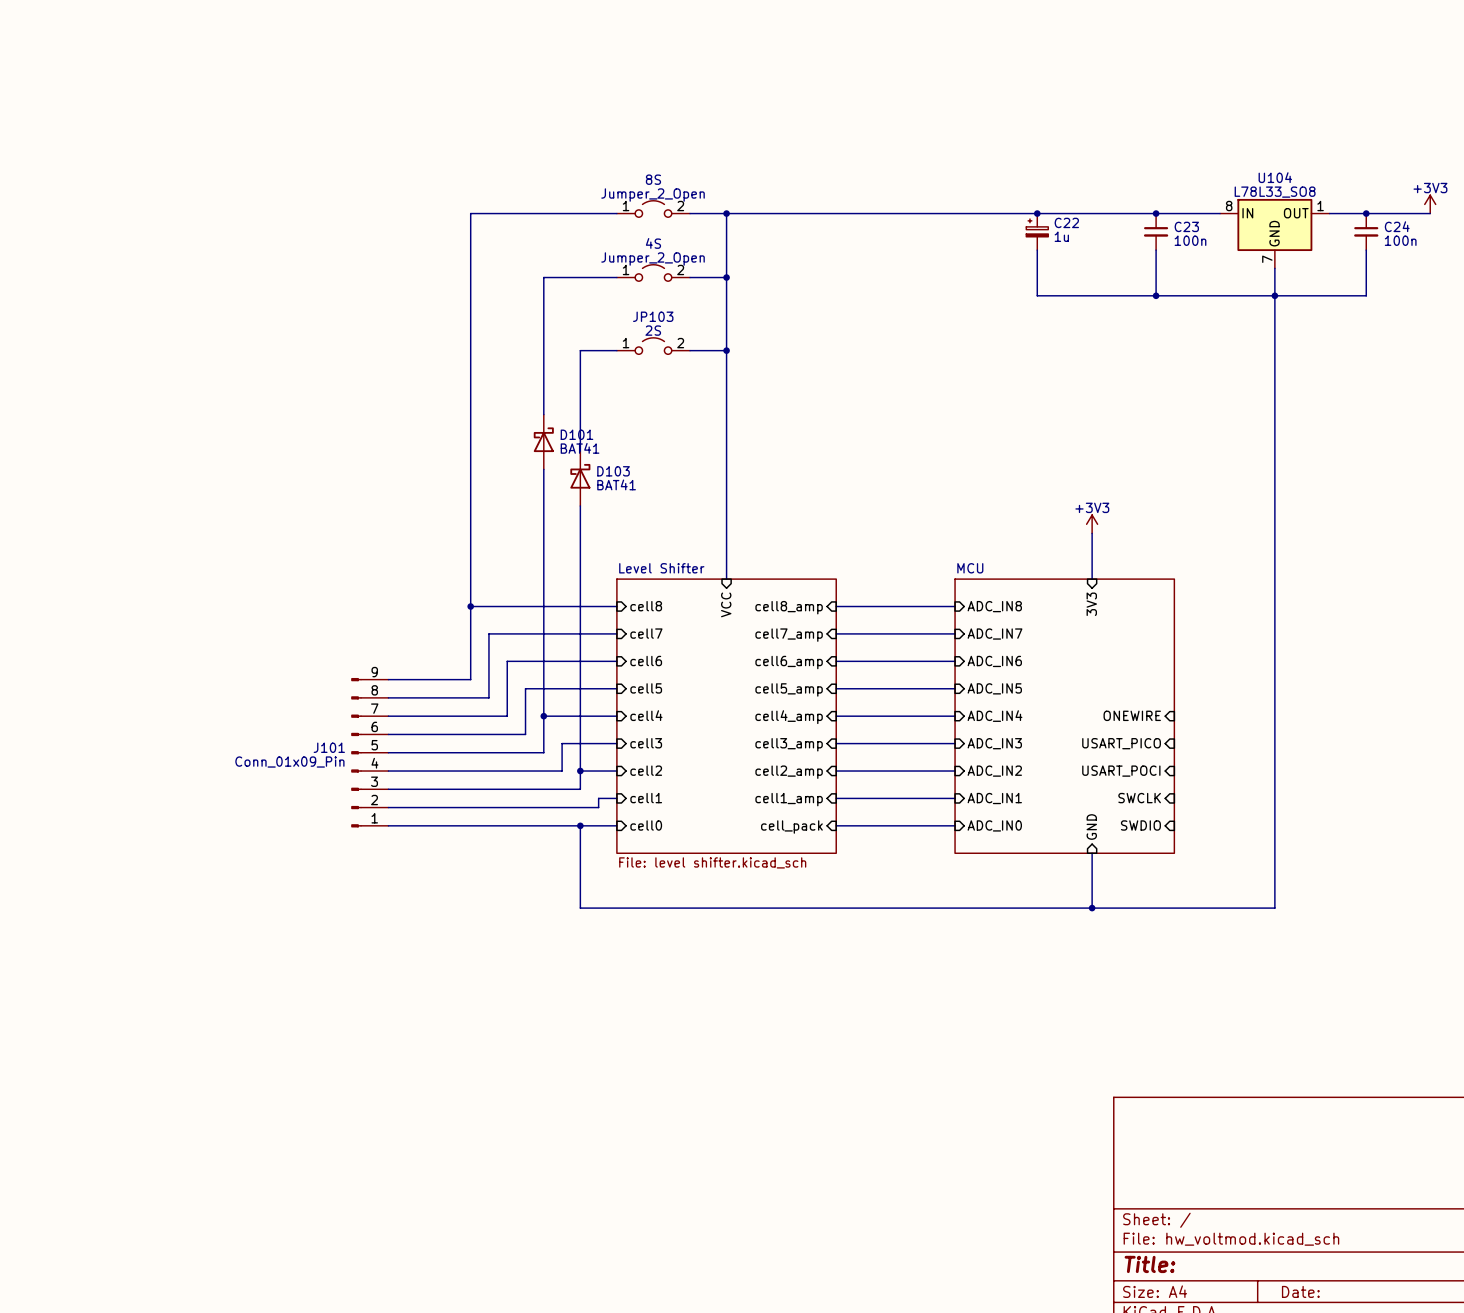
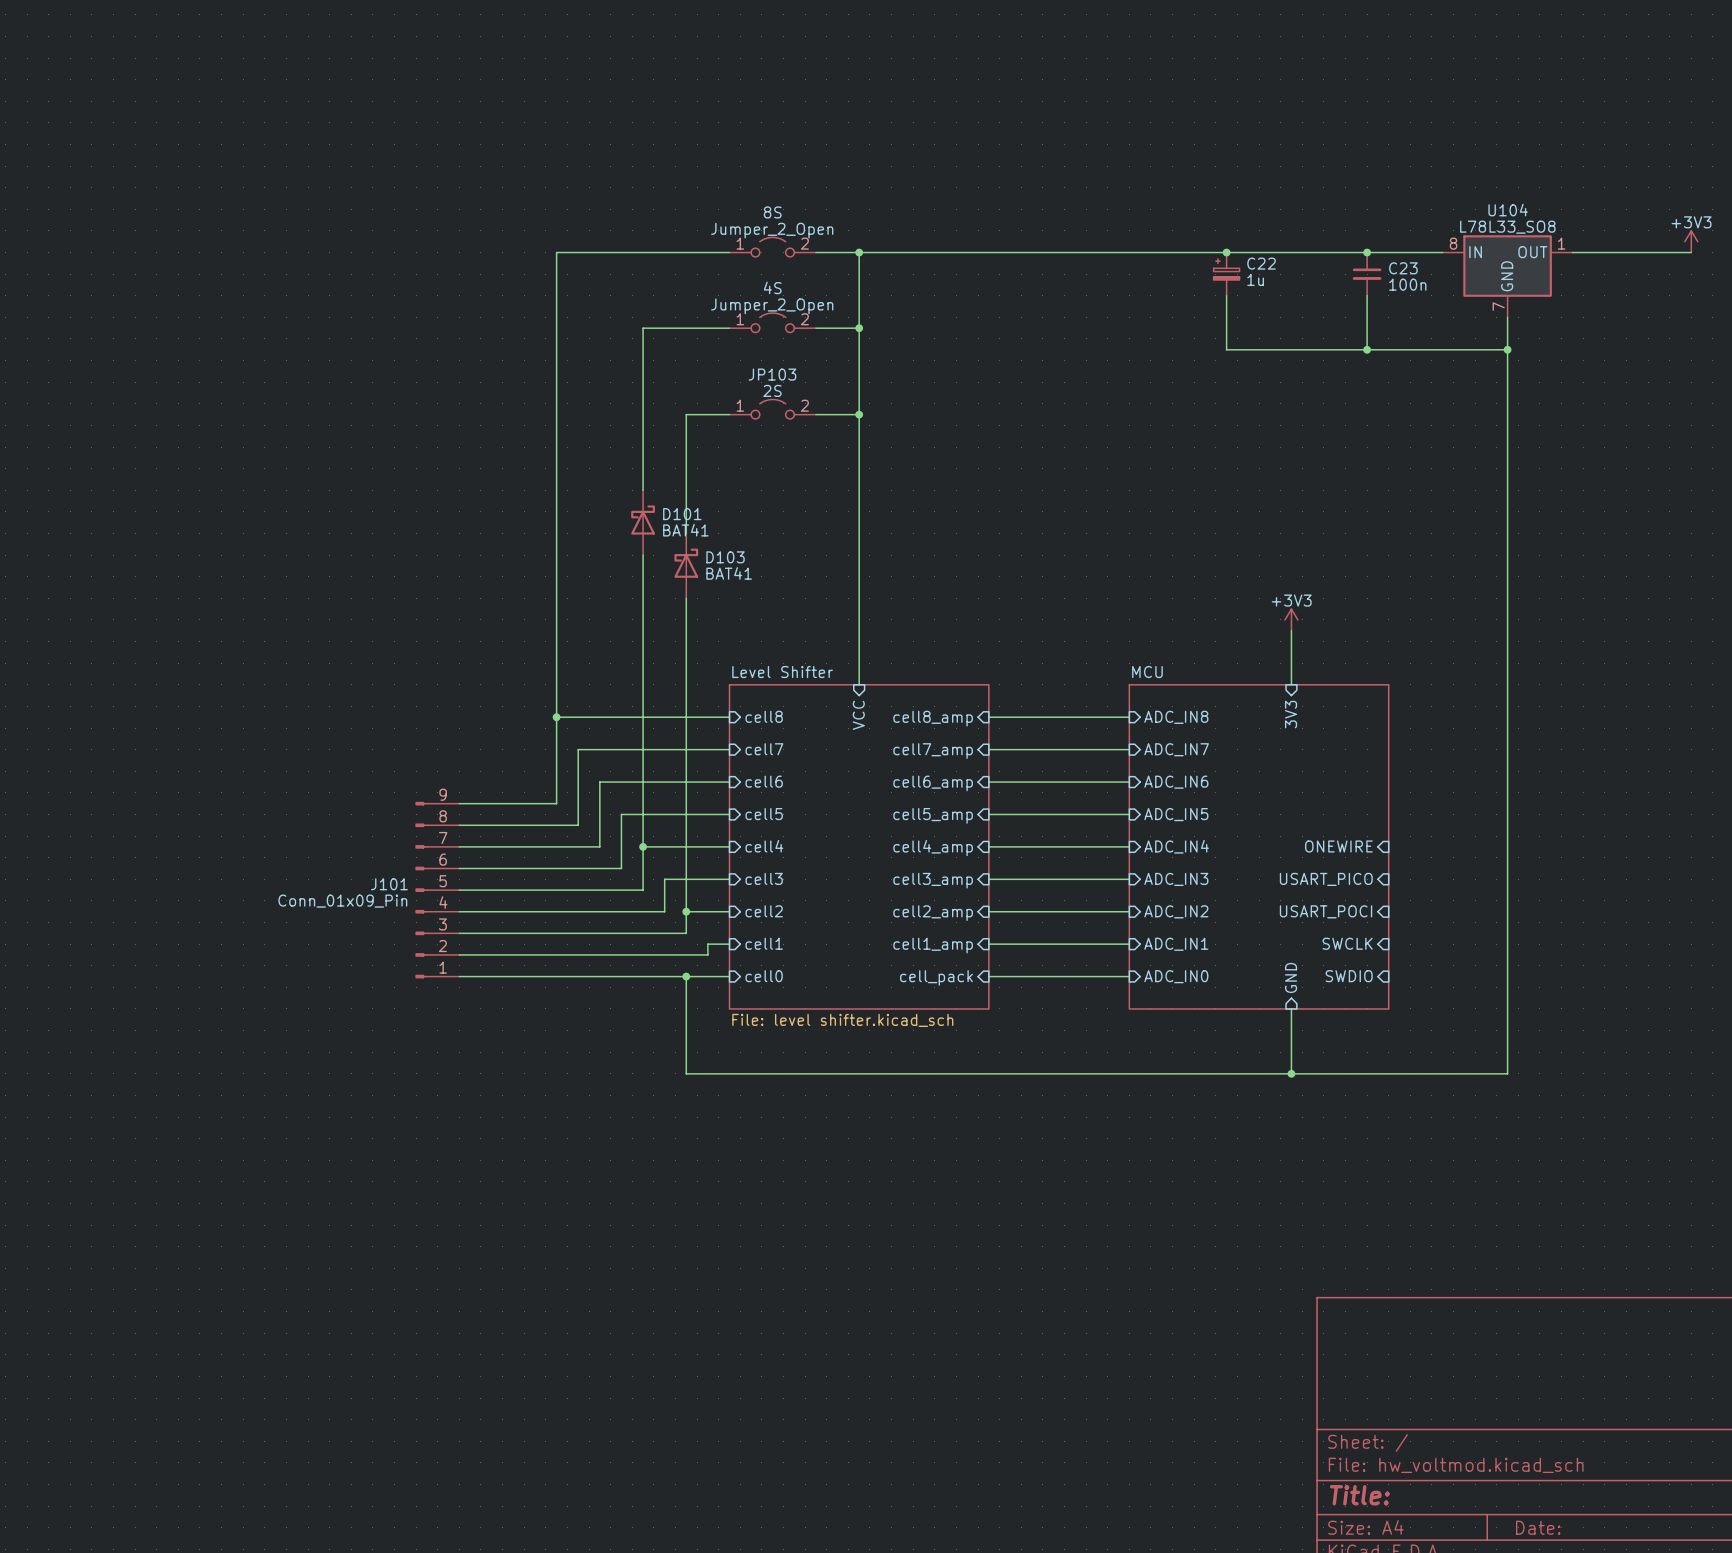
junction: (1366, 213) -> none
C24: 100n (1366, 231) -> none
wire: (1366, 250) (1366, 295) (1274, 295) -> none

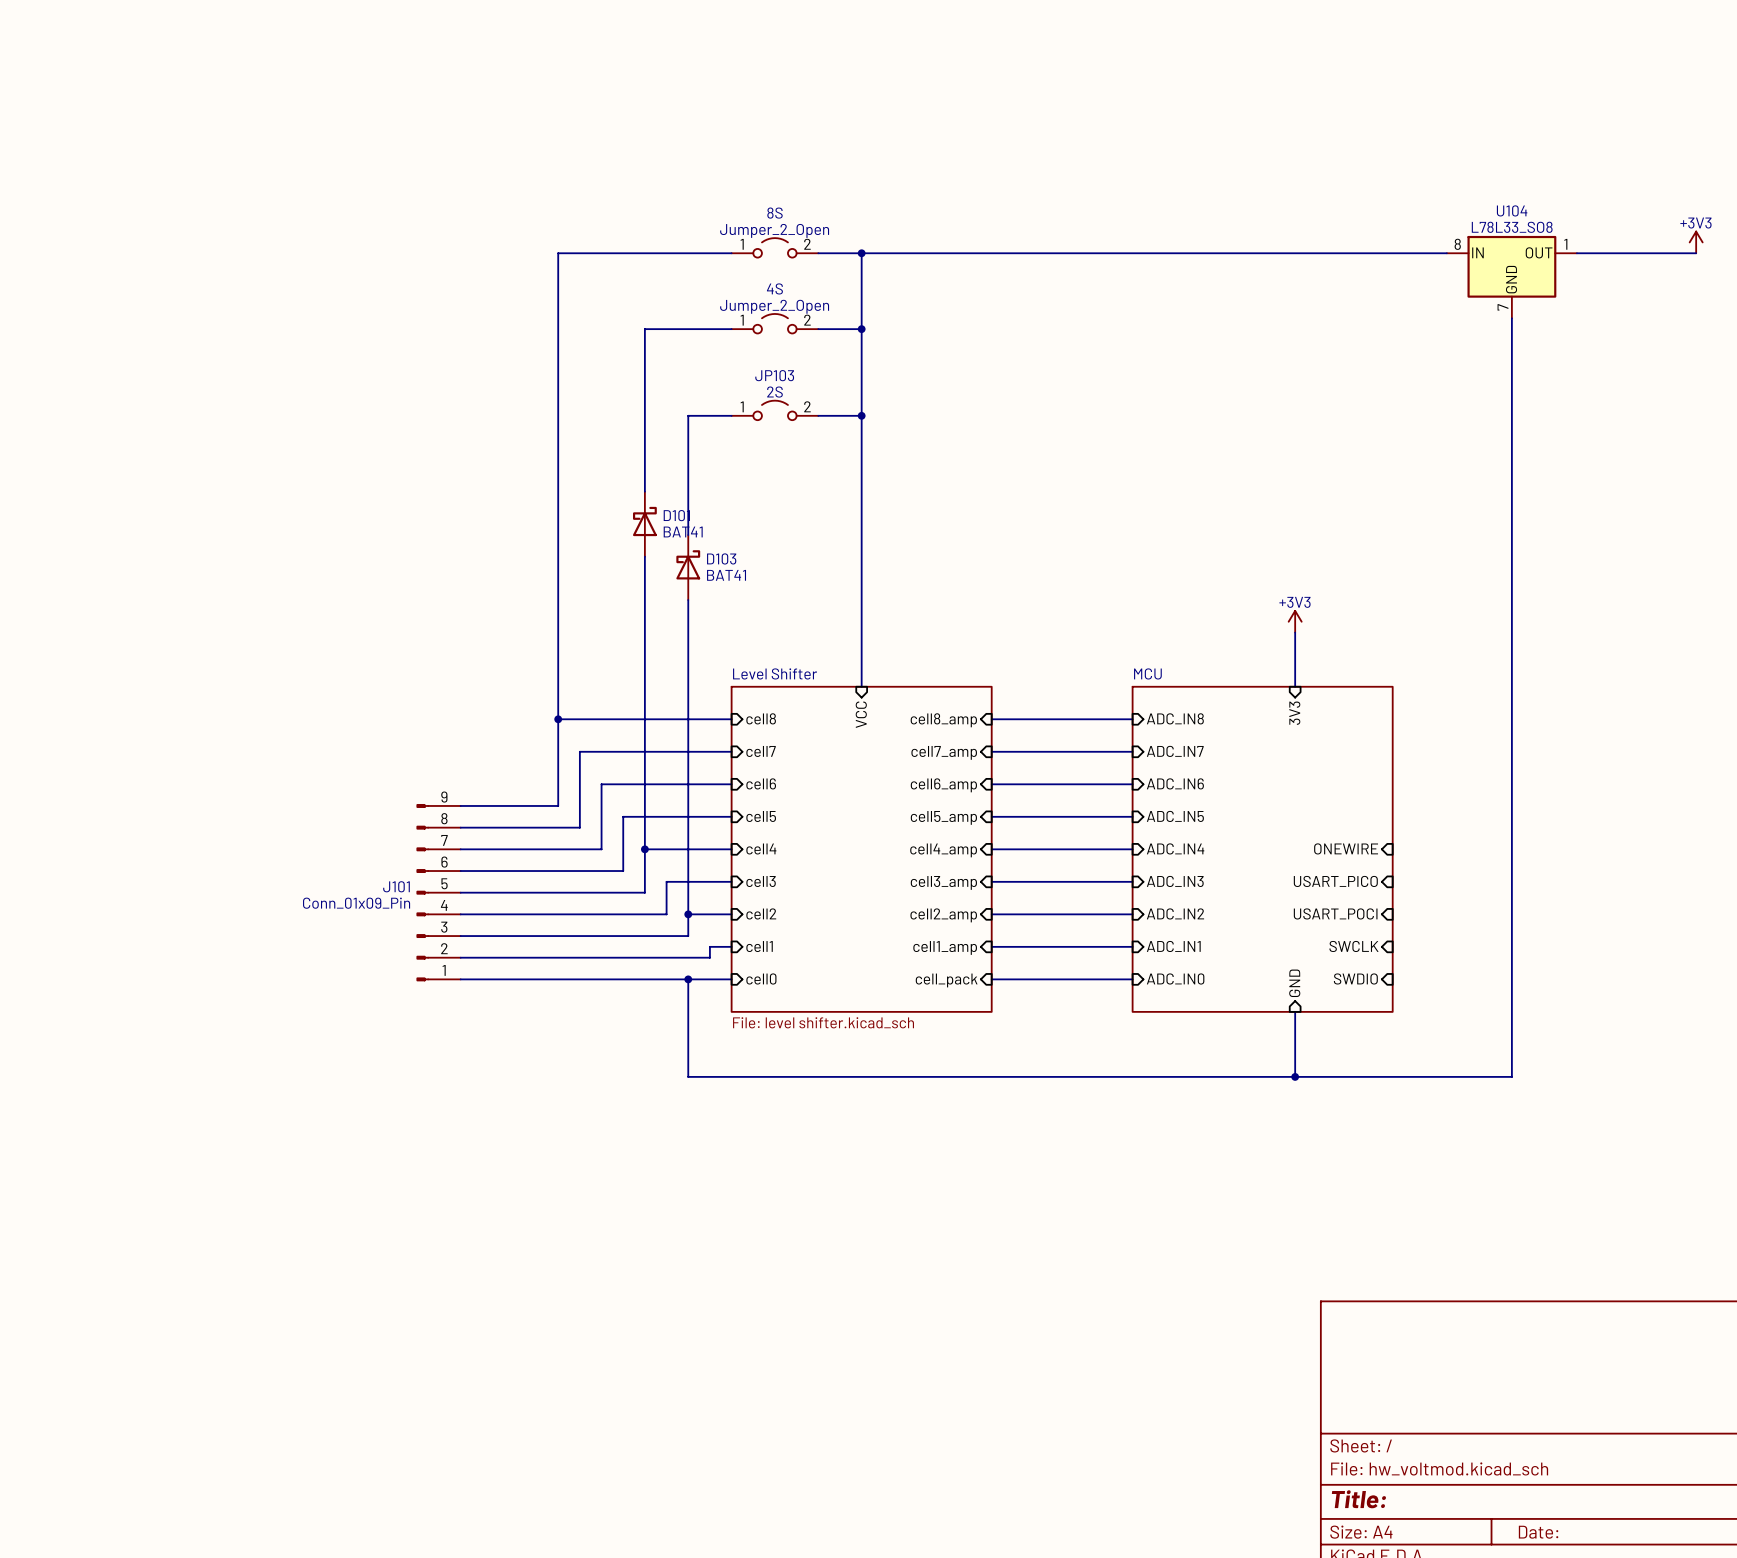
junction: (1226, 252) -> none
junction: (1367, 252) -> none
C22: 1u (1226, 274) -> none
C23: 100n (1367, 274) -> none
wire: (1226, 295) (1226, 349) (1507, 349) -> none
wire: (1367, 295) (1367, 349) -> none
junction: (1367, 349) -> none
junction: (1507, 349) -> none

